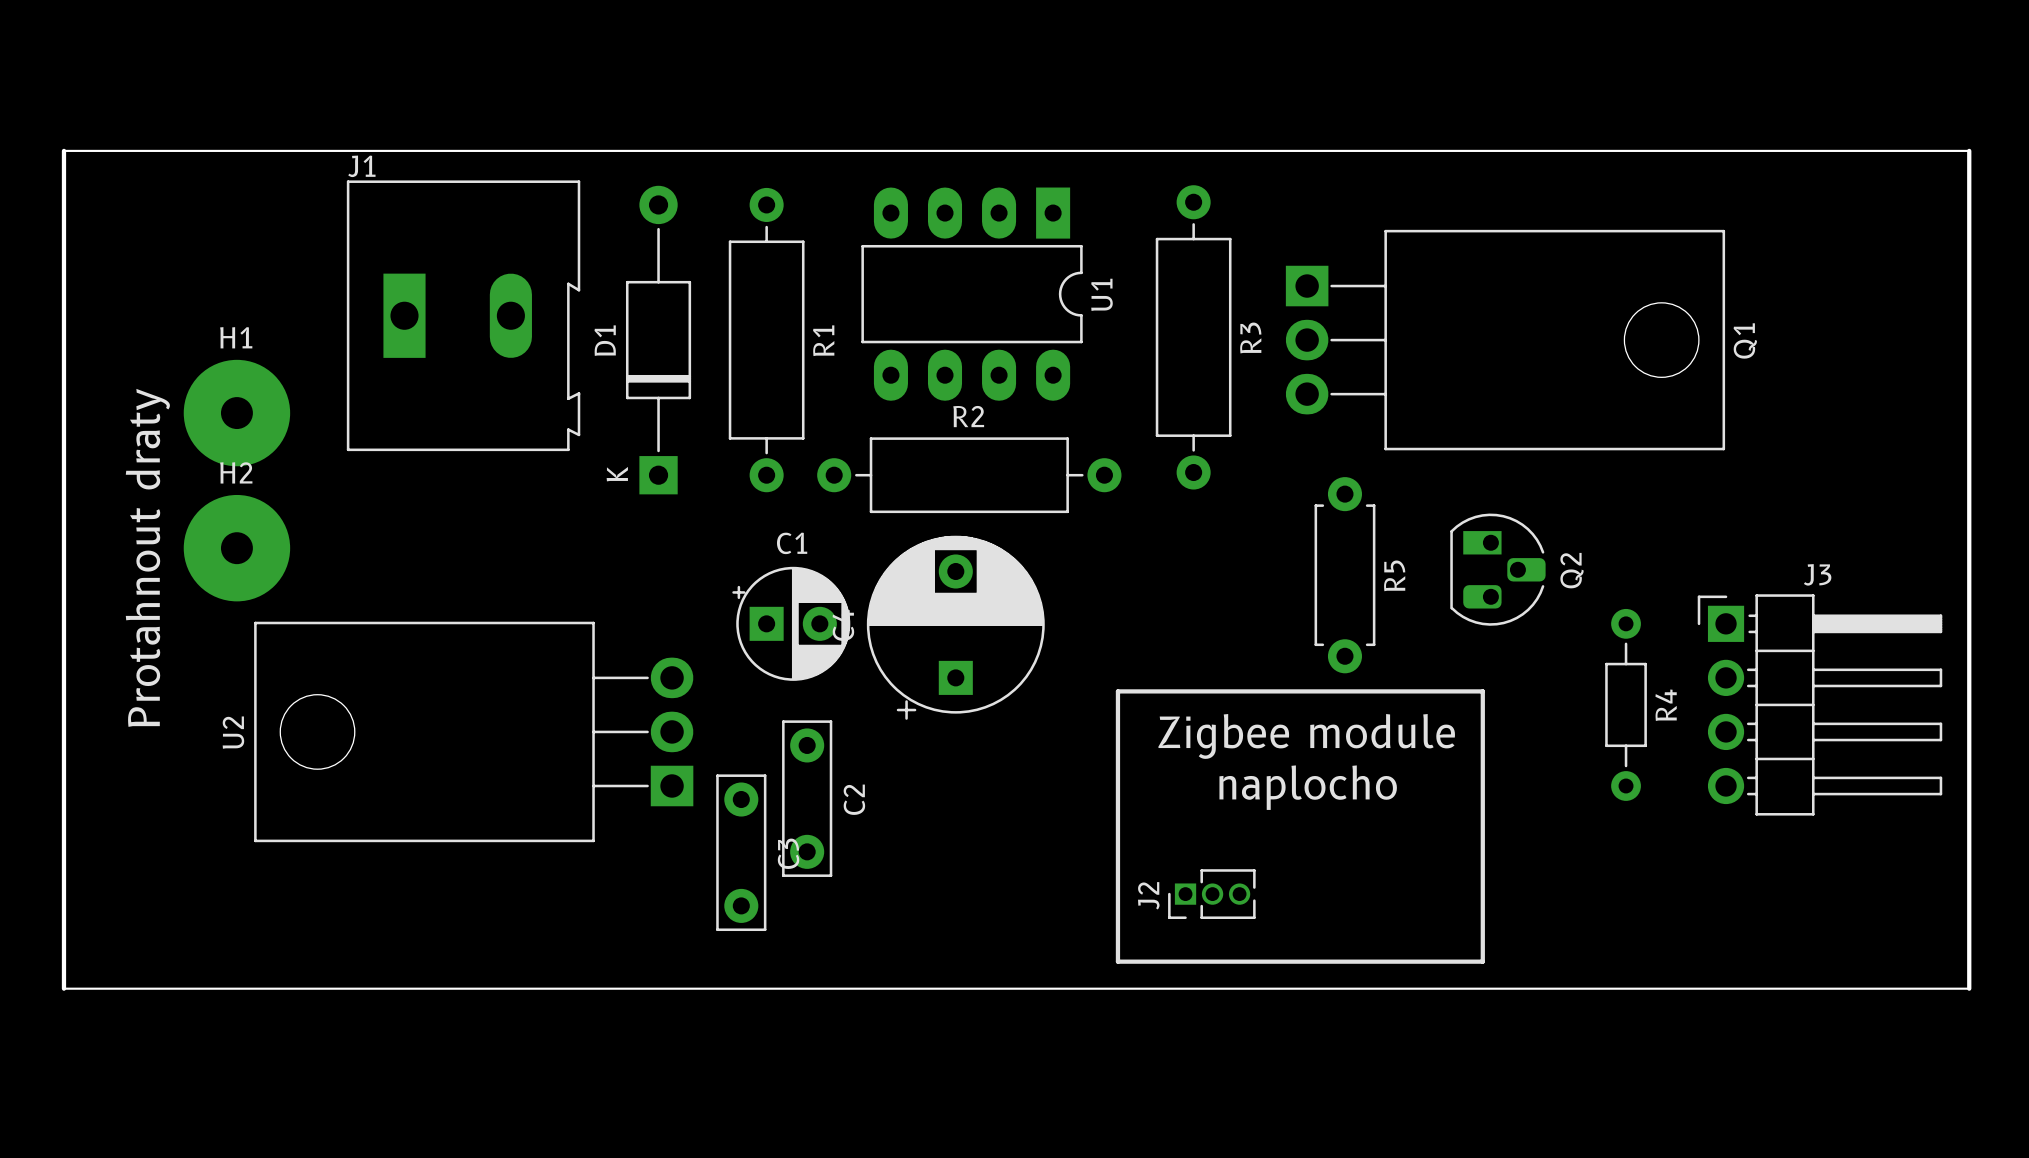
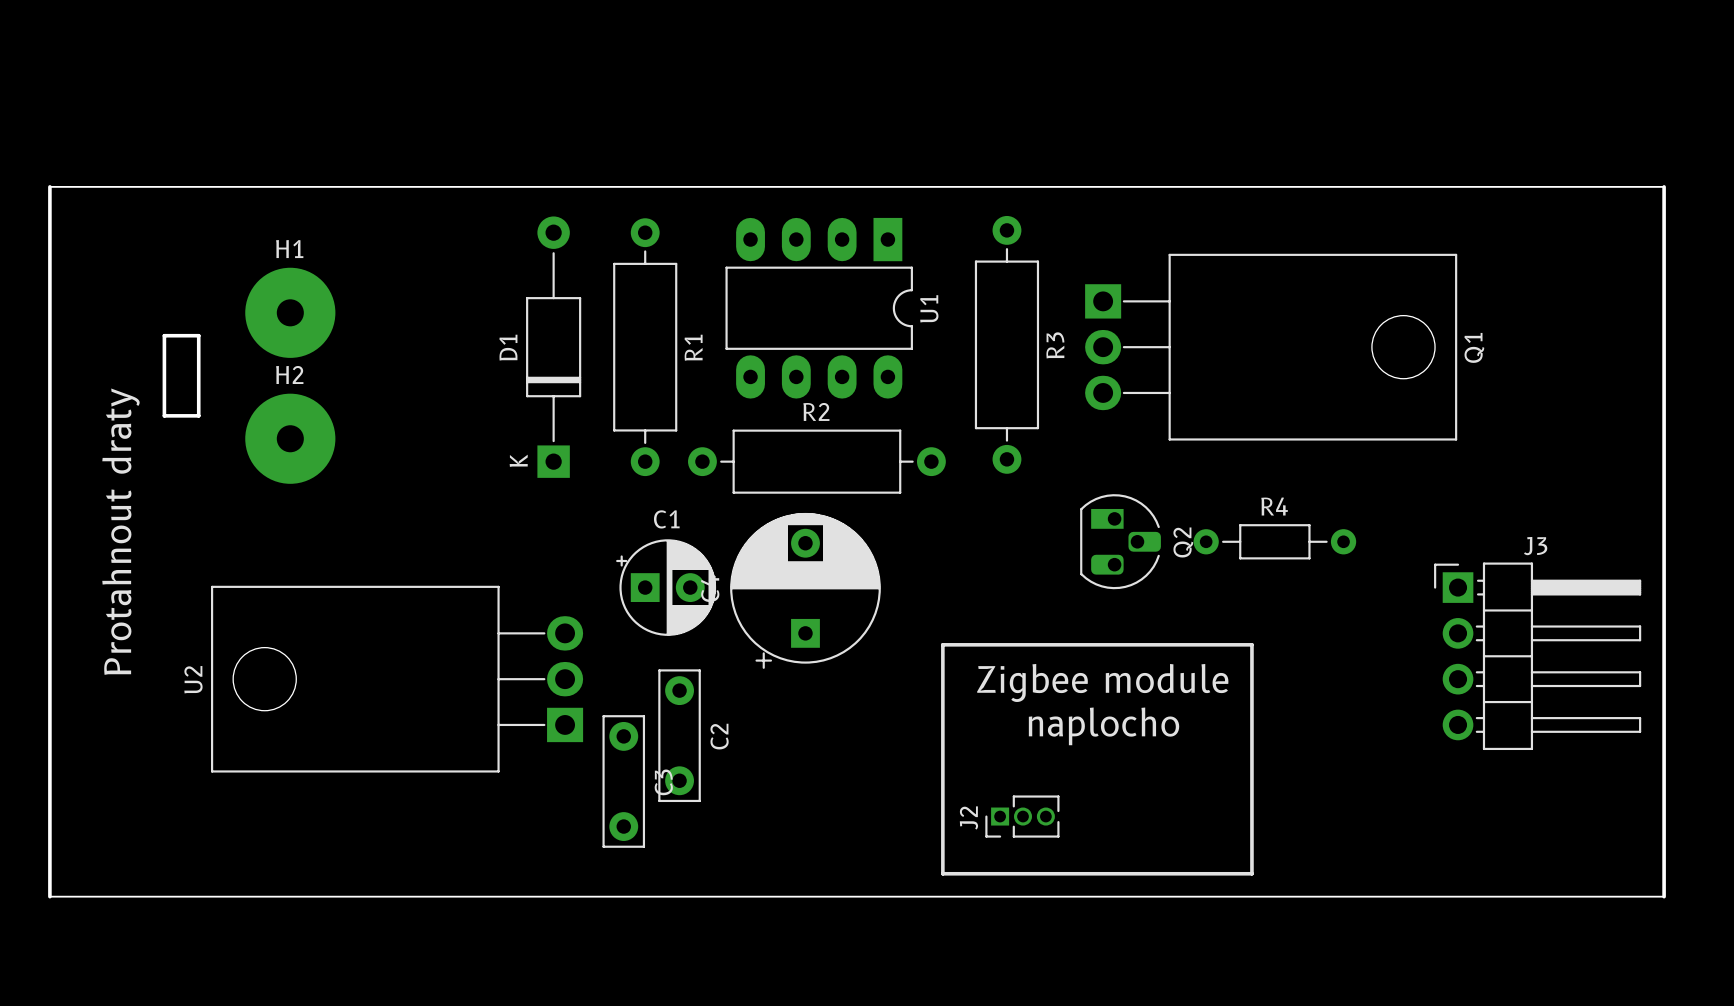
J1: (463, 315) -> none
board edge: none -> (164, 335) (198, 335) (198, 415) (164, 415) (164, 335)
H1 position: (236, 413) -> (290, 312)
H2 position: (236, 548) -> (290, 438)
Q2 position: (1497, 569) -> (1120, 541)
R5: (1344, 575) -> none
R4 rotation: 0° (1626, 704) -> 90° clockwise (1274, 541)
R4 position: (1626, 704) -> (1274, 541)
R4 name position: R4 (1666, 705) -> R4 (1274, 506)

